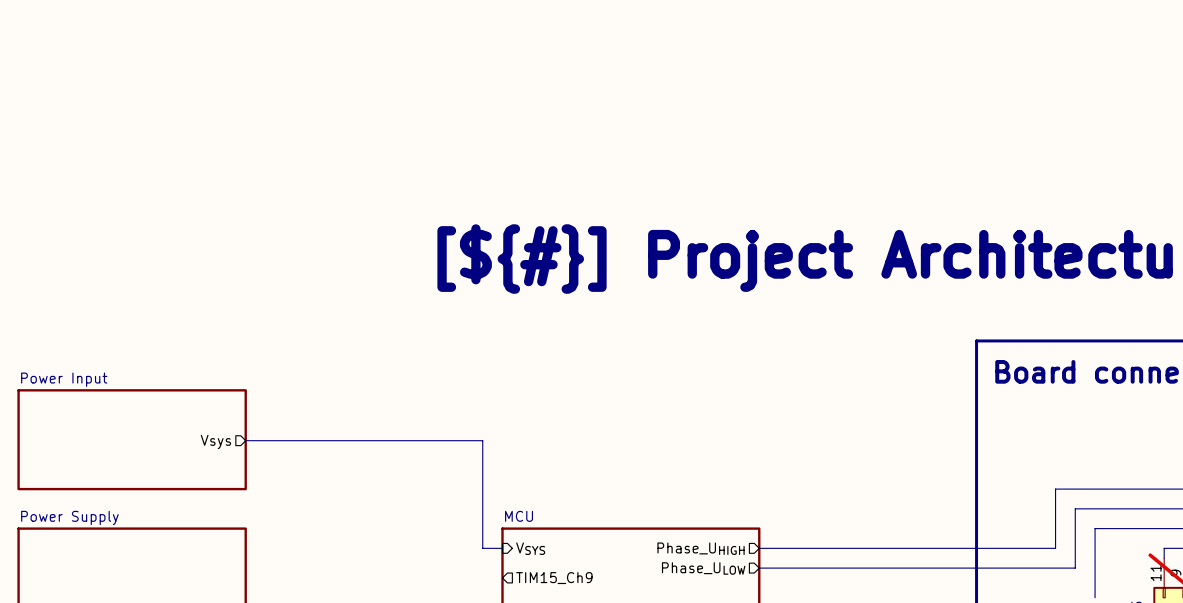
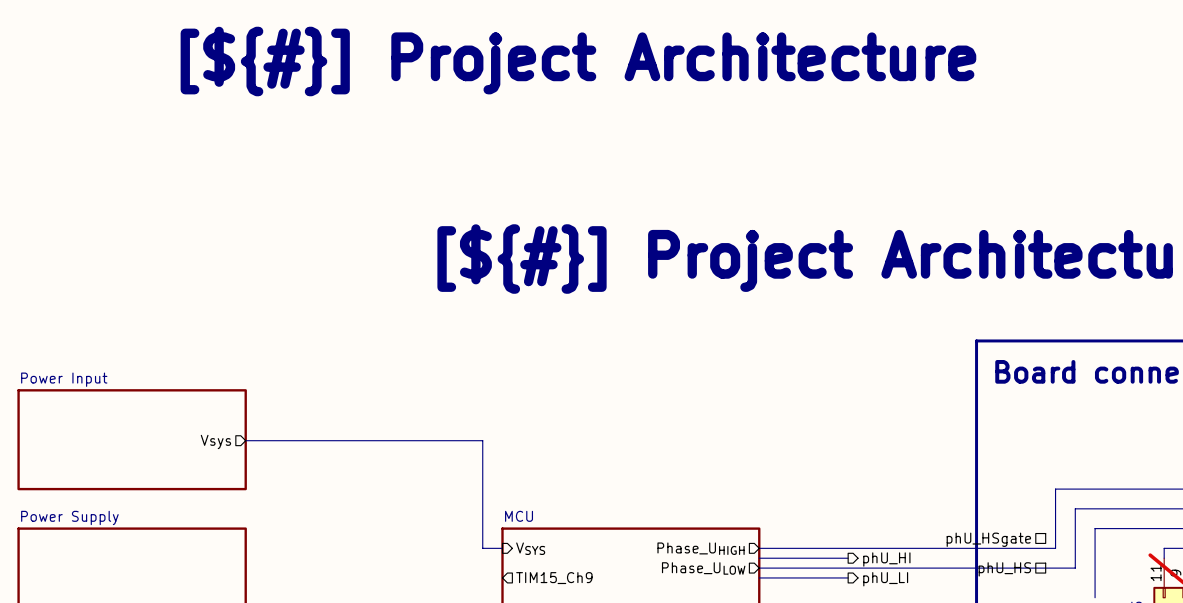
text: none -> [${#}] Project Architecture (578, 61)
sheet pin: none -> phU_HSgate (988, 539)
wire: none -> (759, 558) (848, 558)
sheet pin: none -> phU_HI (886, 559)
sheet pin: none -> phU_HS (1004, 569)
wire: none -> (759, 577) (848, 577)
sheet pin: none -> phU_LI (885, 579)

